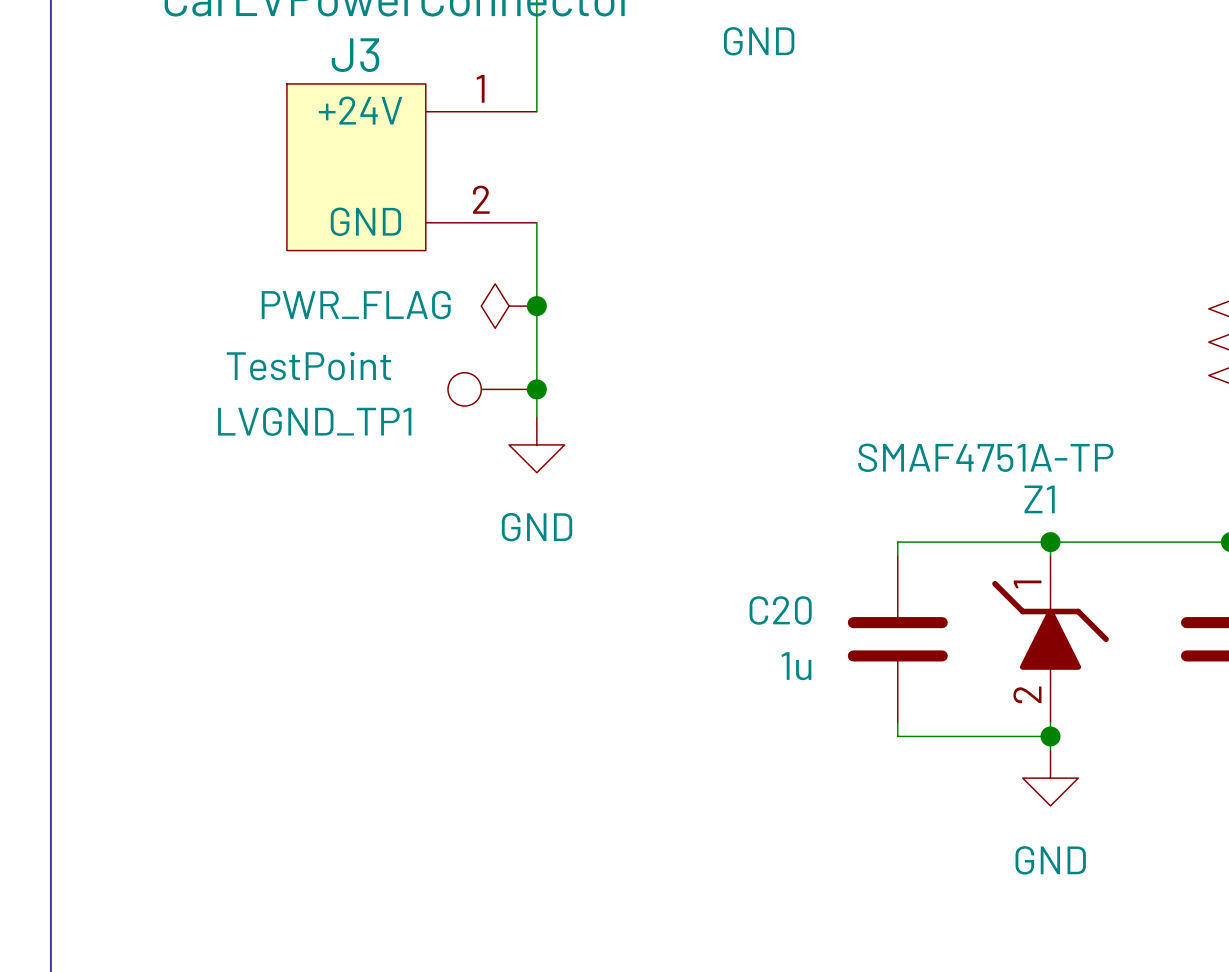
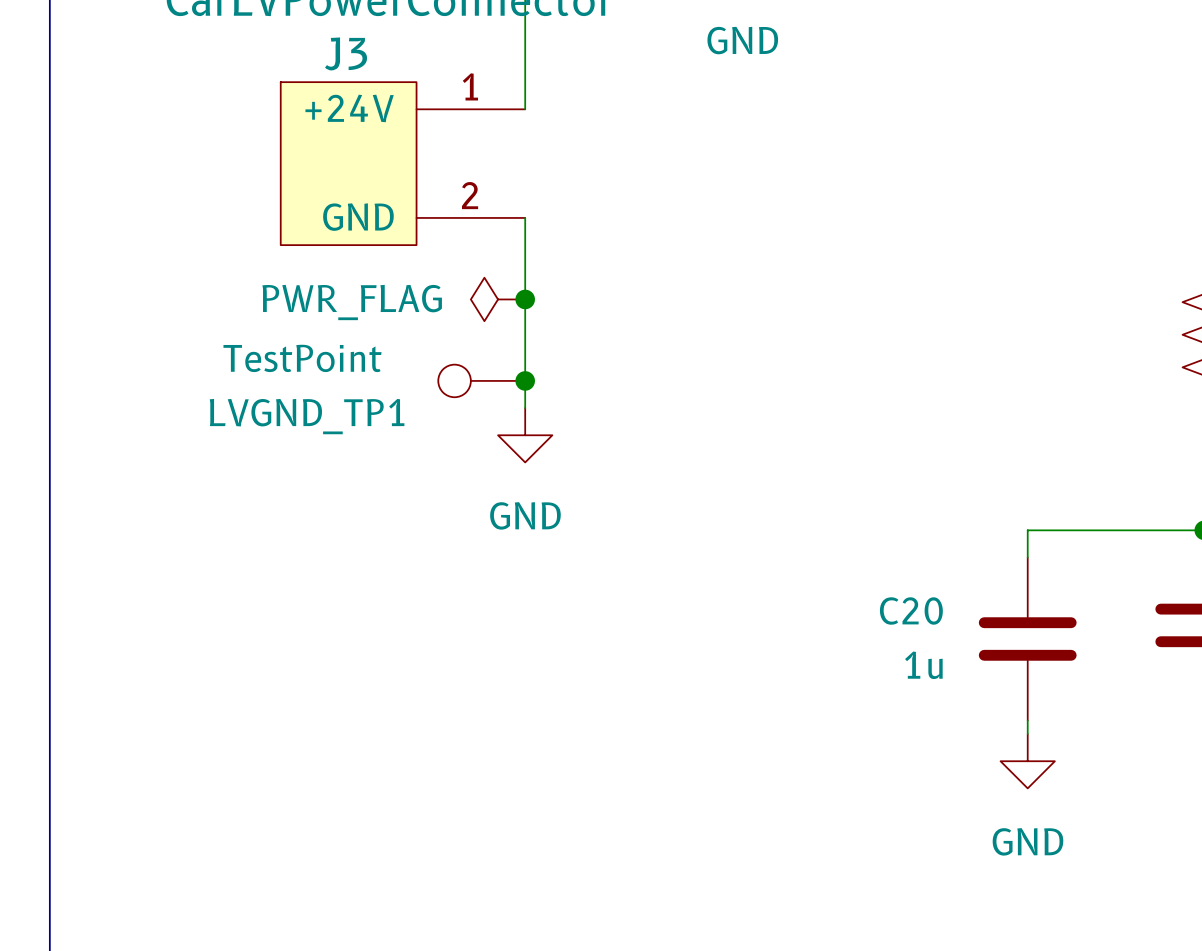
wire: (1050, 542) (897, 542) (897, 555) -> none
junction: (1050, 542) -> none
C20 position: (897, 639) -> (1027, 639)
Z1: SMAF4751A-TP (1050, 639) -> none
wire: (897, 722) (897, 736) (1050, 736) (1050, 722) -> none
junction: (1050, 736) -> none

